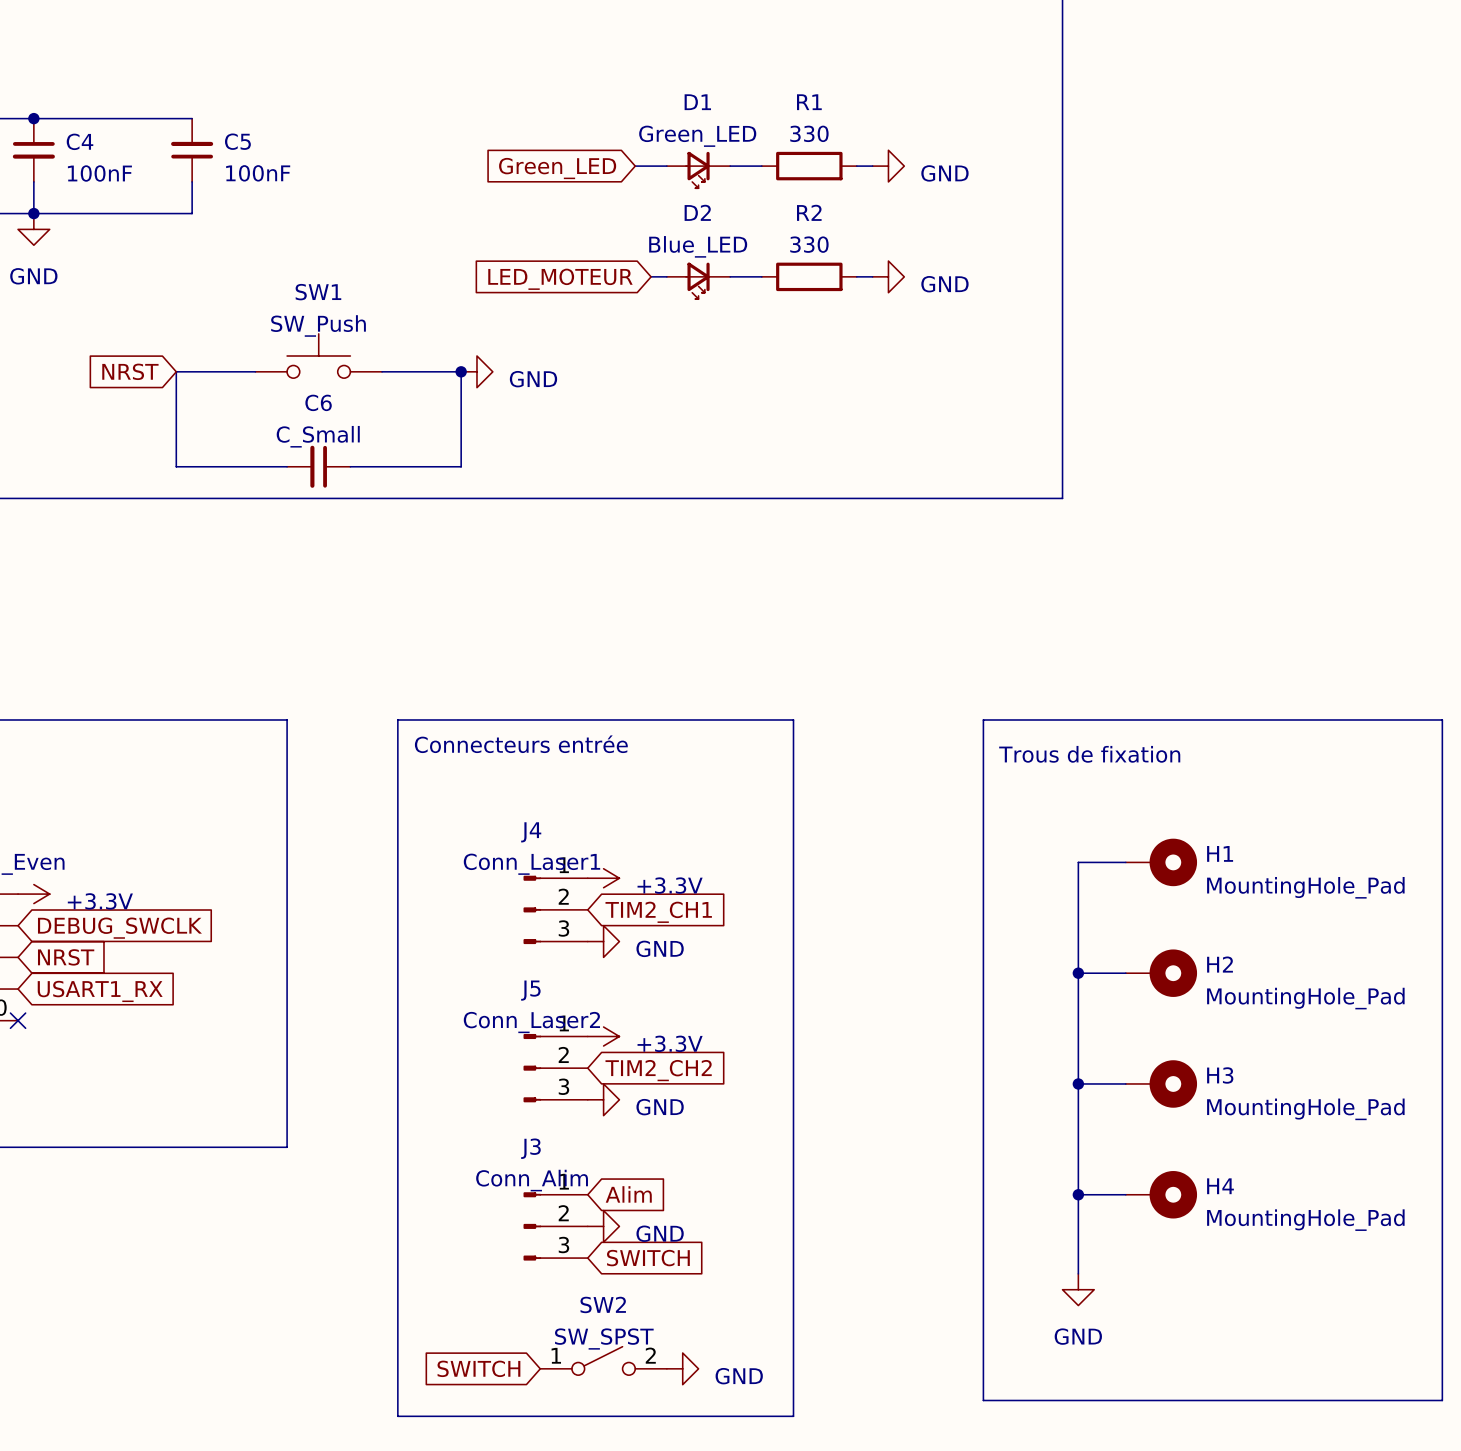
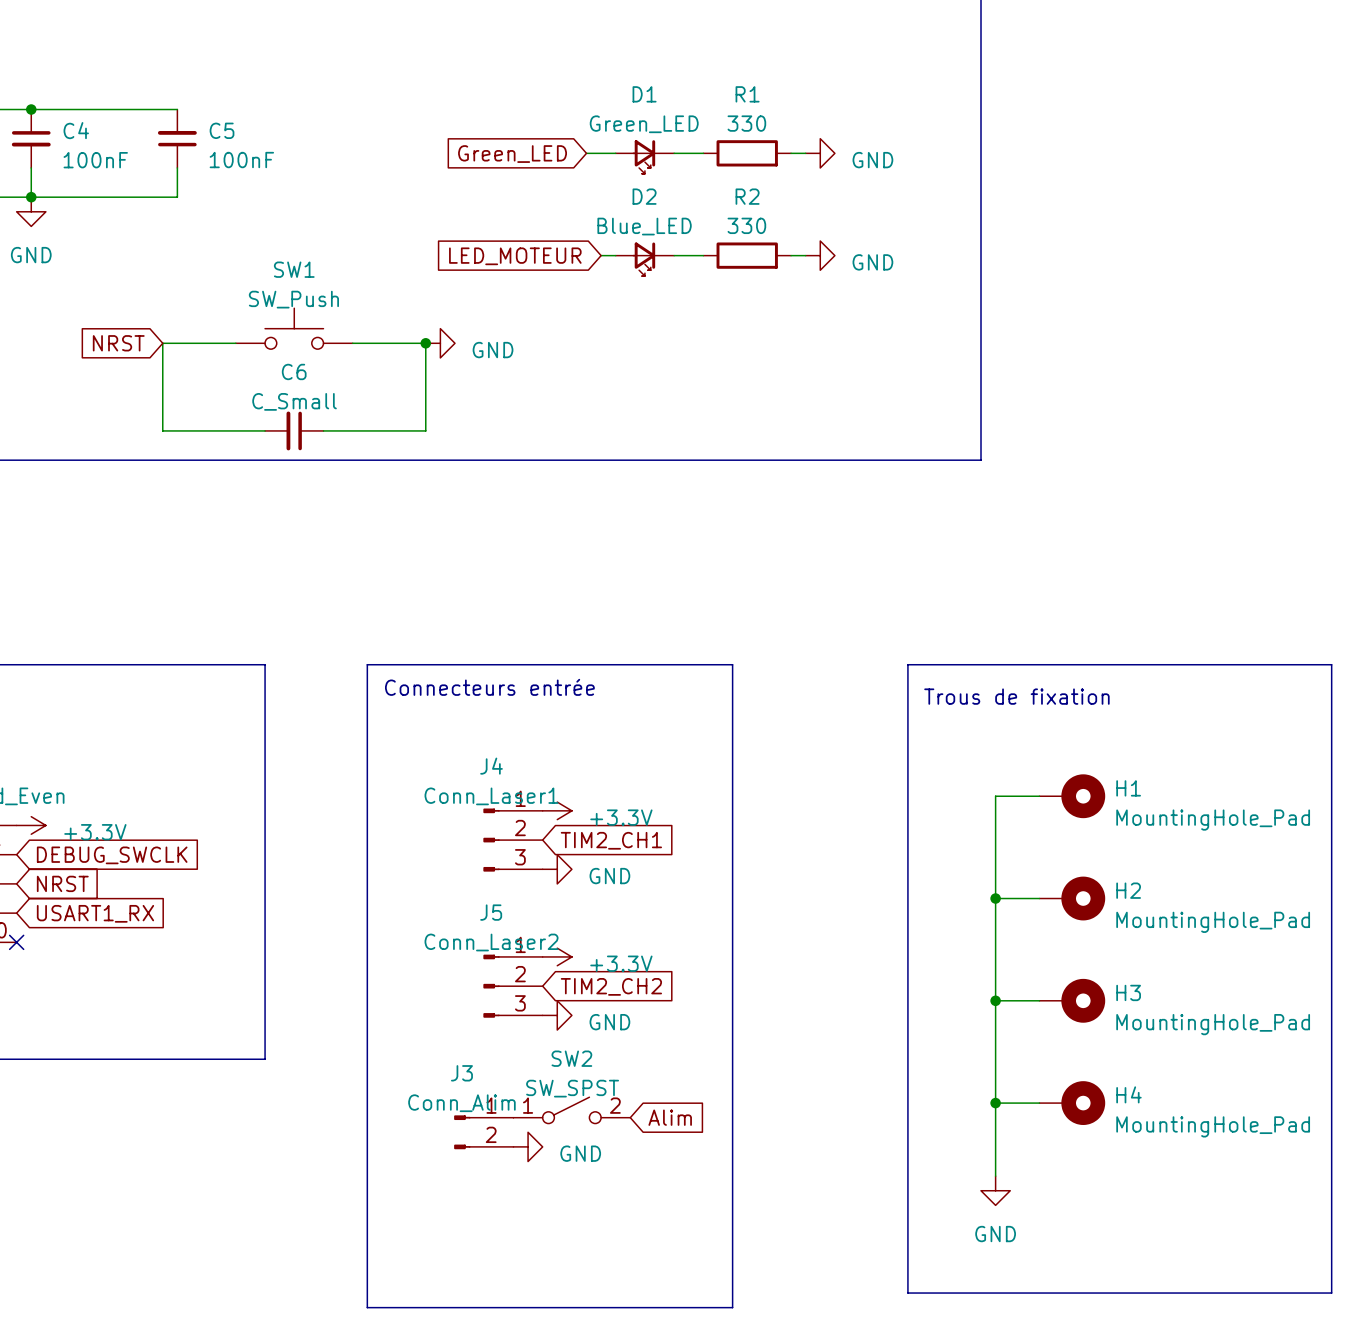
J3 symbol: [523, 1192, 588, 1261] -> [454, 1115, 514, 1150]
global label position: Alim (628, 1194) -> Alim (670, 1117)
power symbol position: GND (603, 1226) -> GND (528, 1146)
global label: SWITCH (648, 1258) -> none
SW2 position: (603, 1360) -> (571, 1110)
global label: SWITCH (478, 1368) -> none
power symbol: GND (682, 1368) -> none

